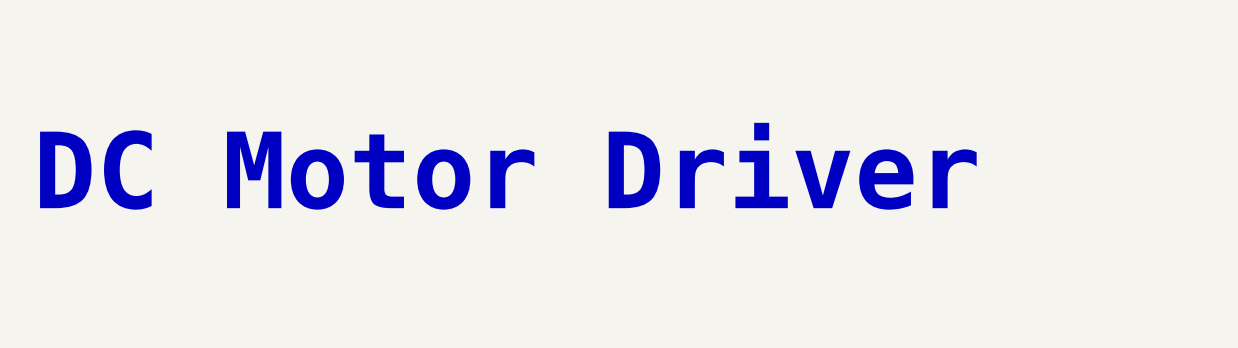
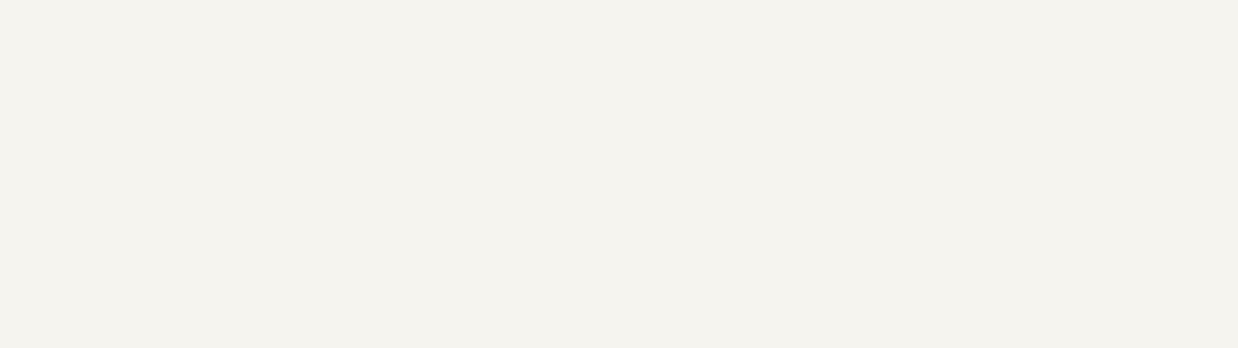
text: DC Motor Driver (508, 166) -> none

